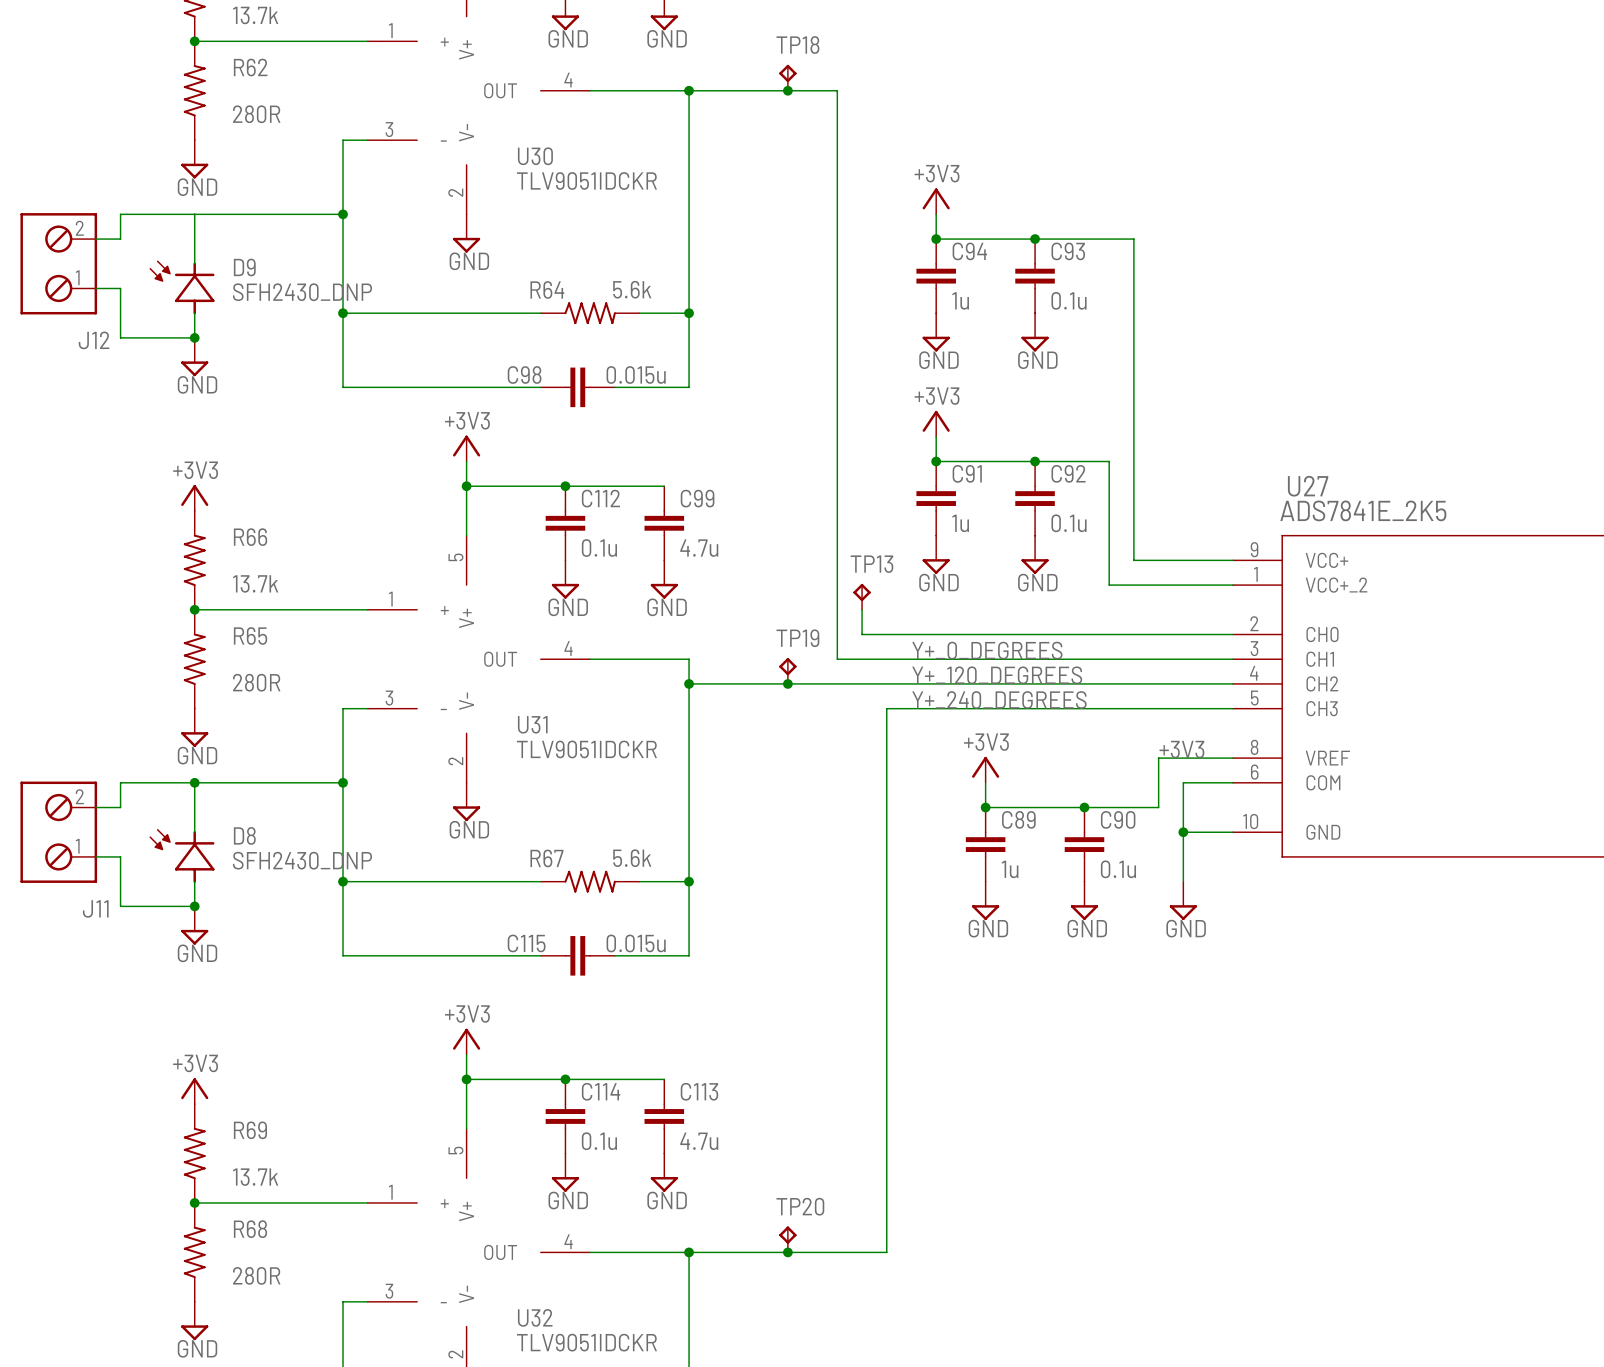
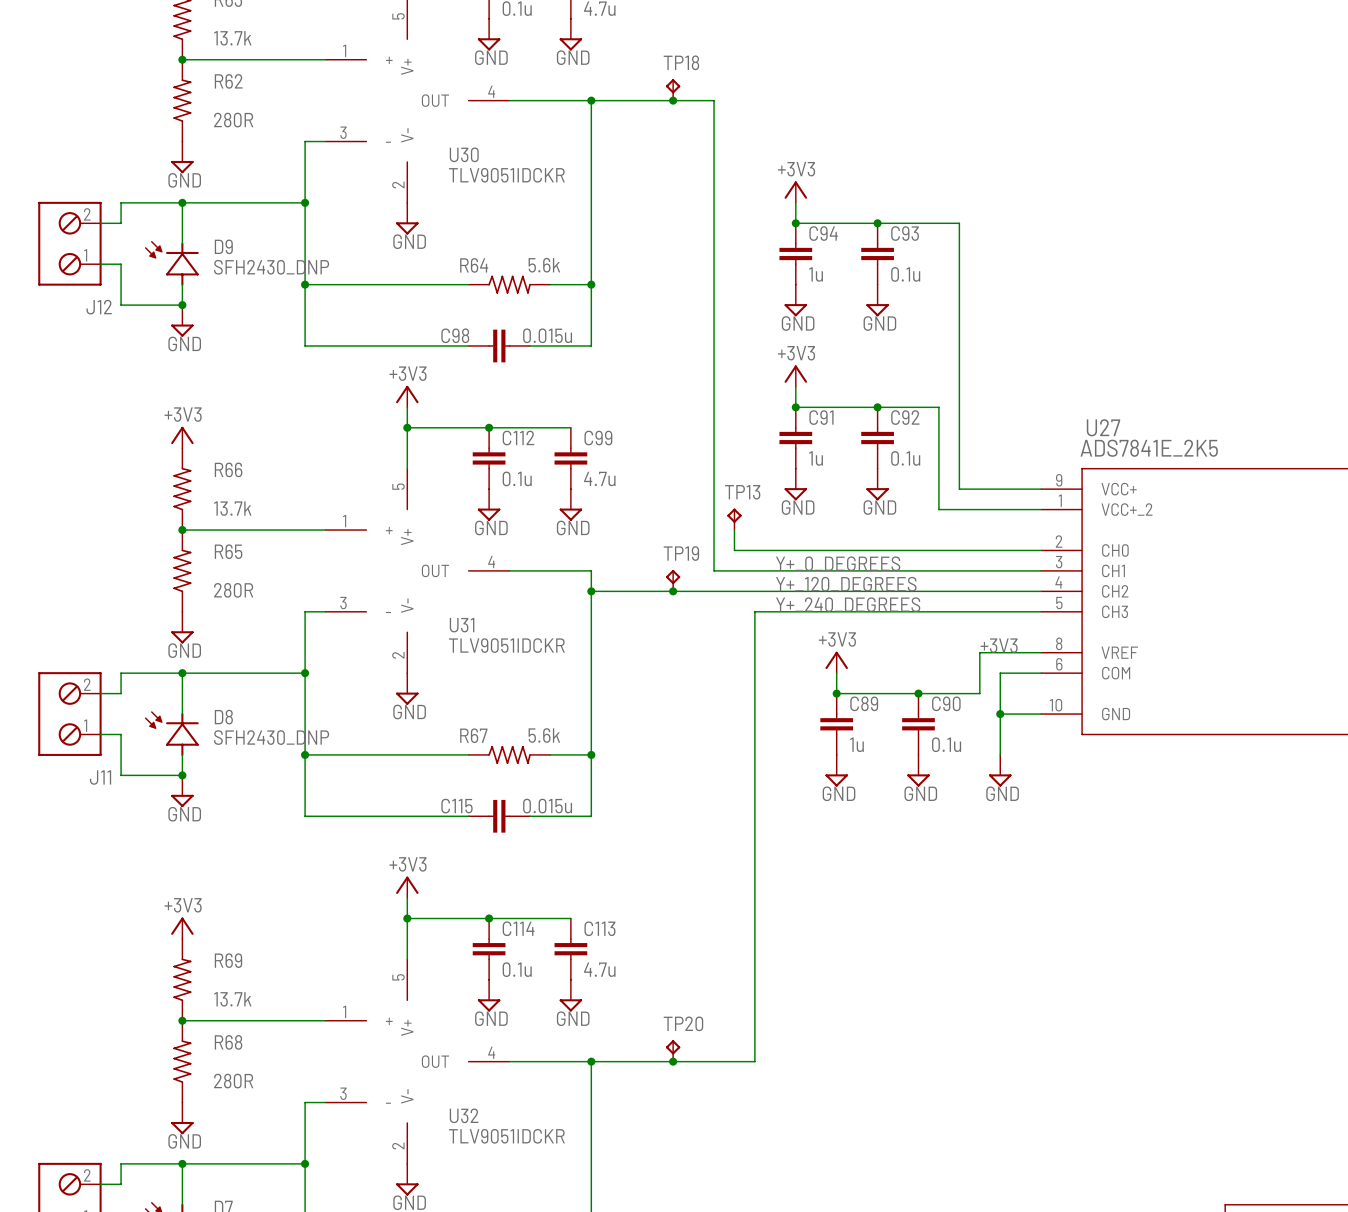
junction: none -> (182, 202)

